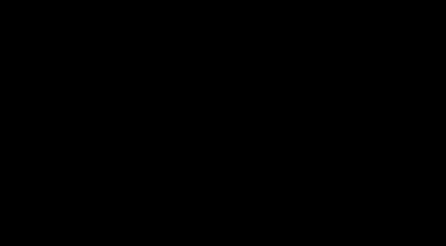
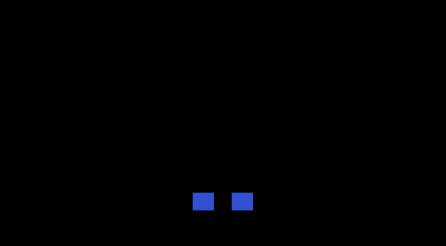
part: none -> (222, 201)

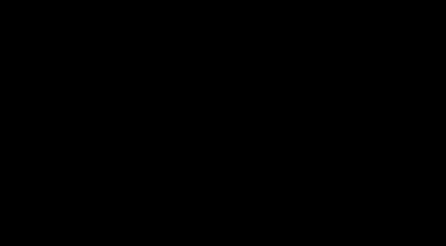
part: (222, 201) -> none

